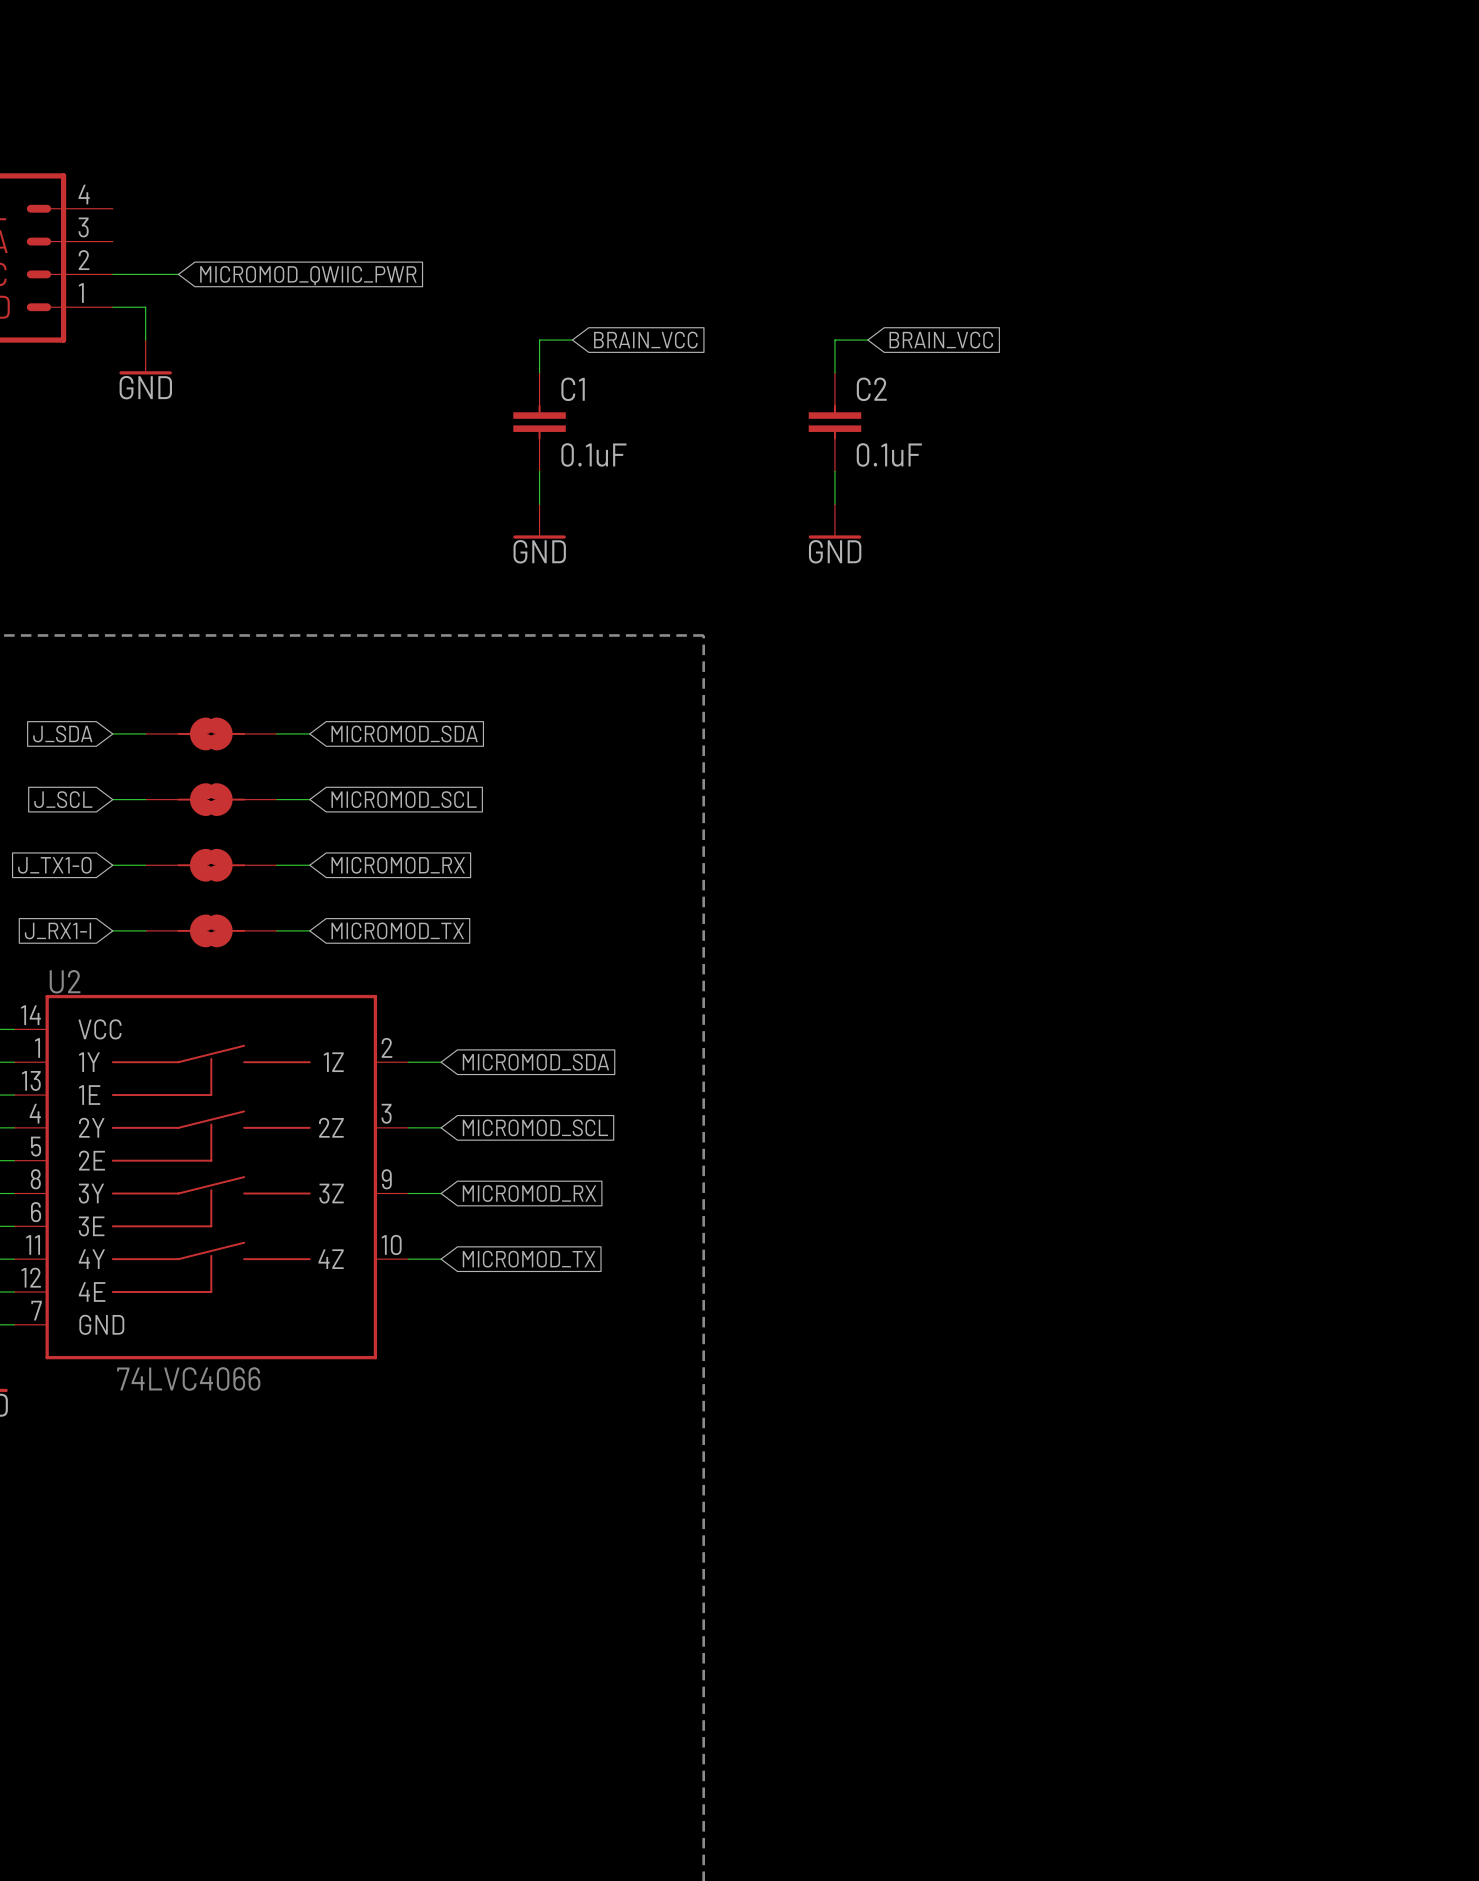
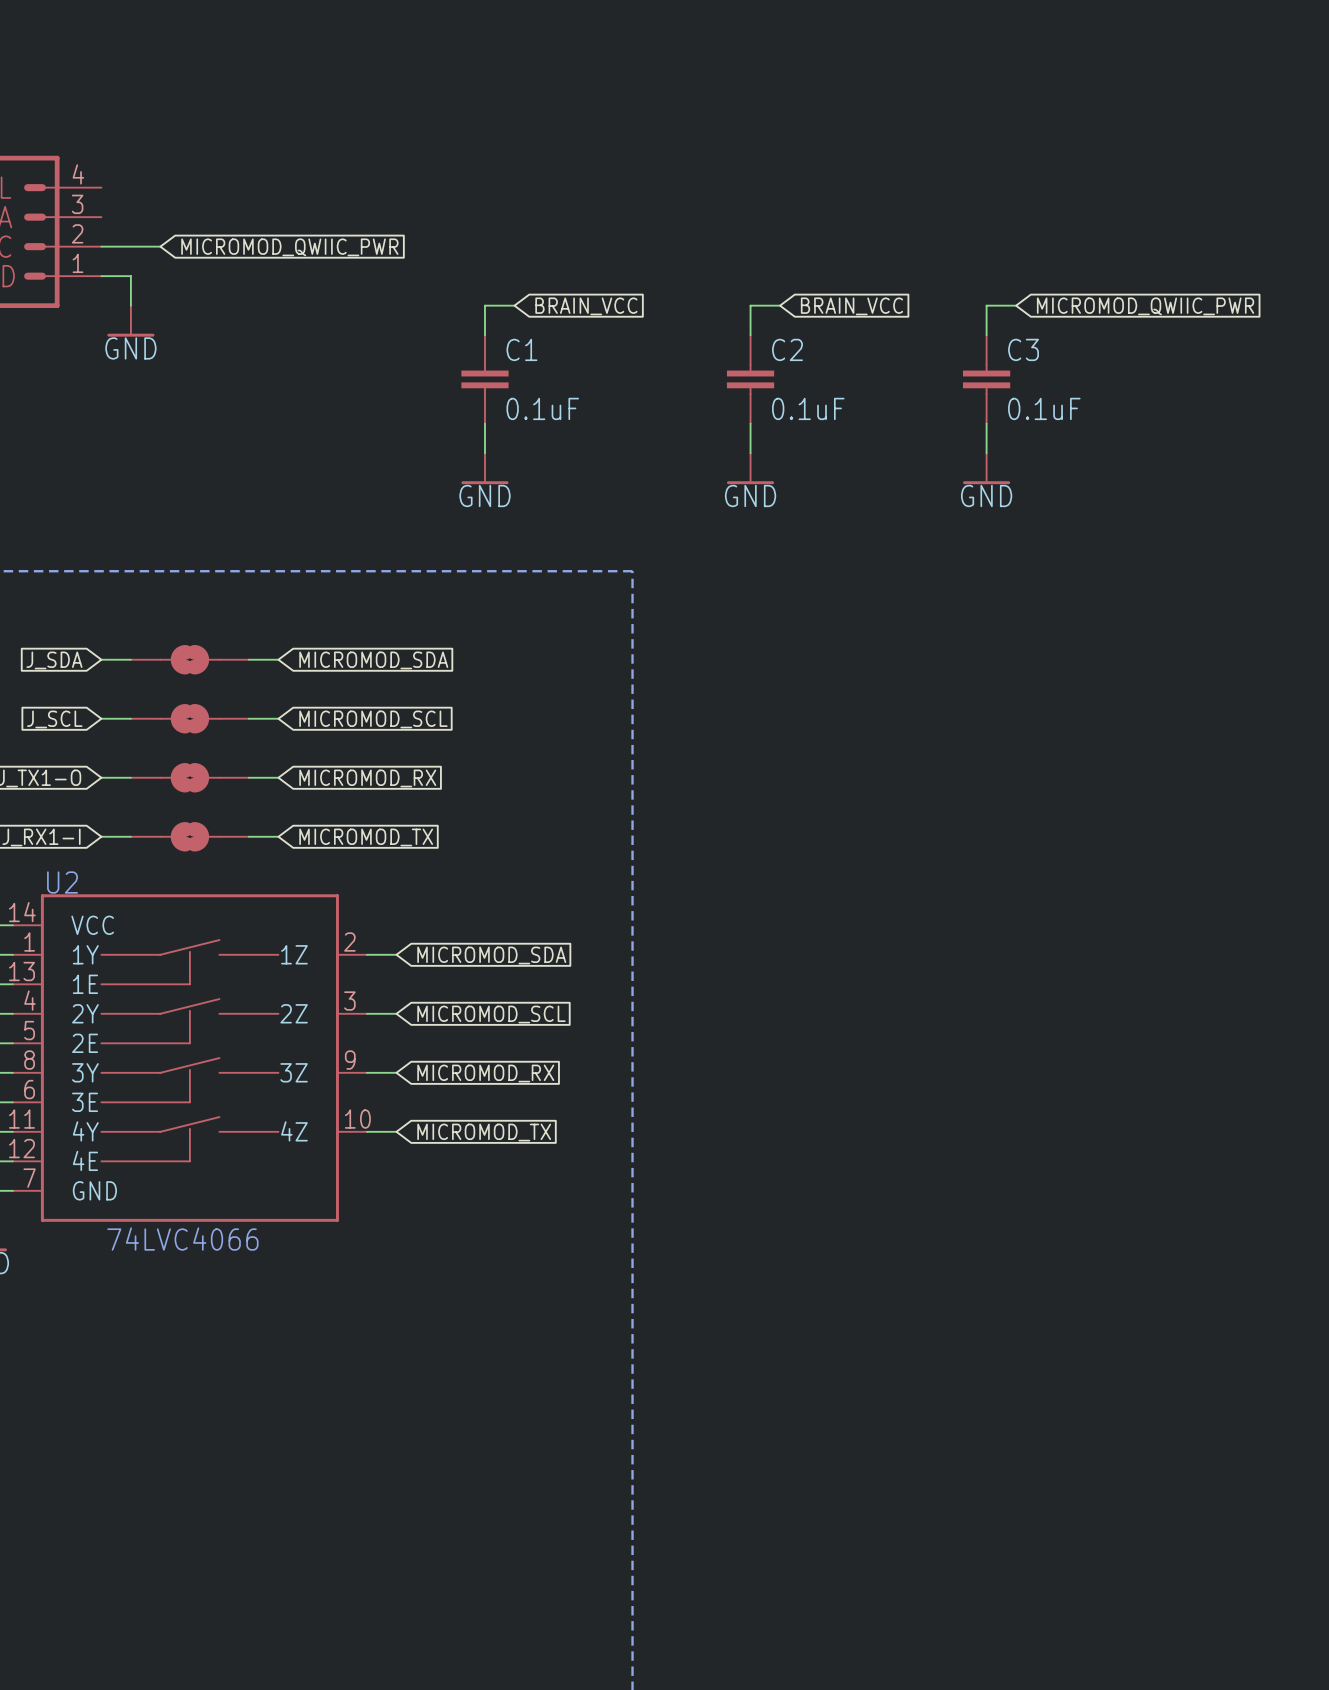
wire: none -> (1016, 305) (986, 305) (986, 335)
global label: none -> MICROMOD_QWIIC_PWR (1145, 306)
C3: none -> 0.1uF (986, 379)
wire: none -> (986, 423) (986, 453)
power symbol: none -> GND (986, 468)

